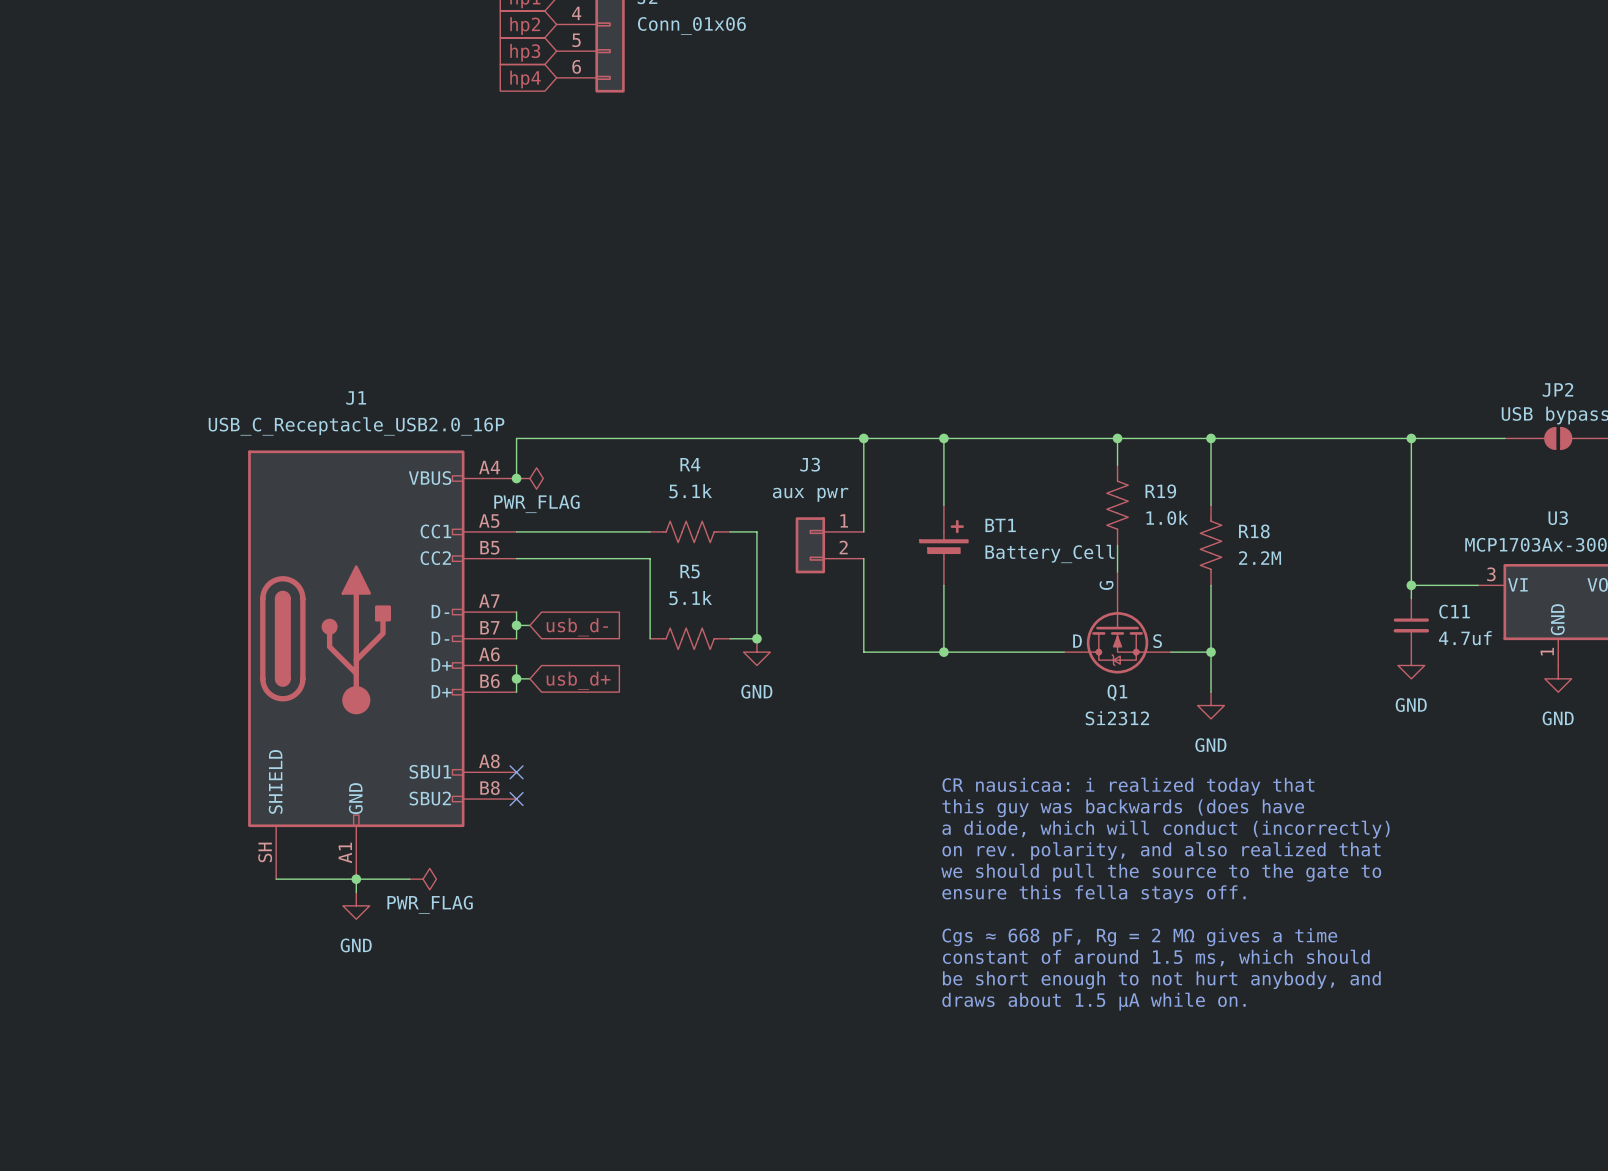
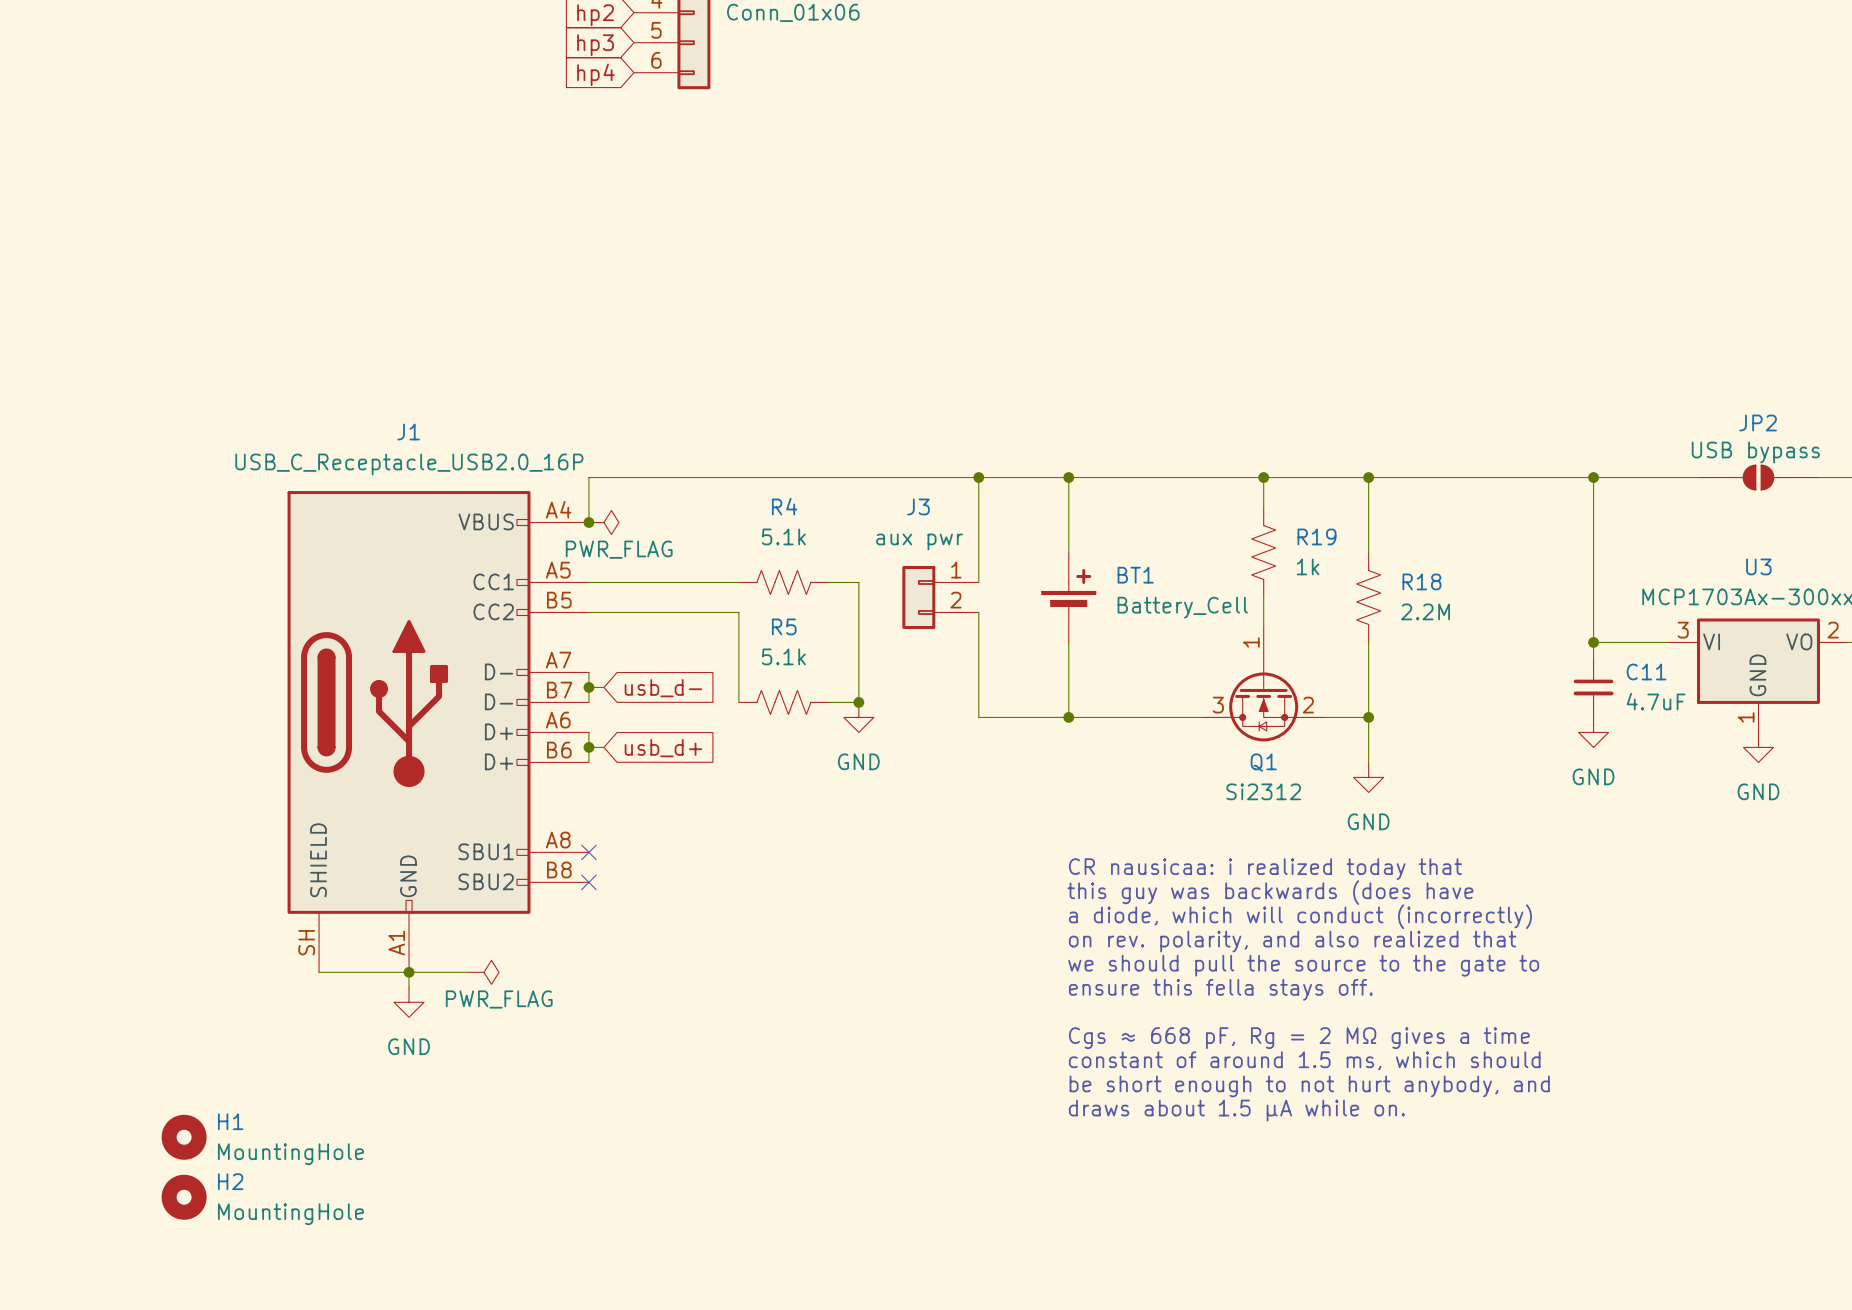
R19 value: 1.0k (1167, 517) -> 1k (1308, 566)
Q1 symbol: [1064, 572, 1171, 674] -> [1203, 627, 1324, 742]
C11 value: 4.7uf (1465, 638) -> 4.7uF (1656, 701)
H1: none -> MountingHole (184, 1137)
H2: none -> MountingHole (184, 1197)

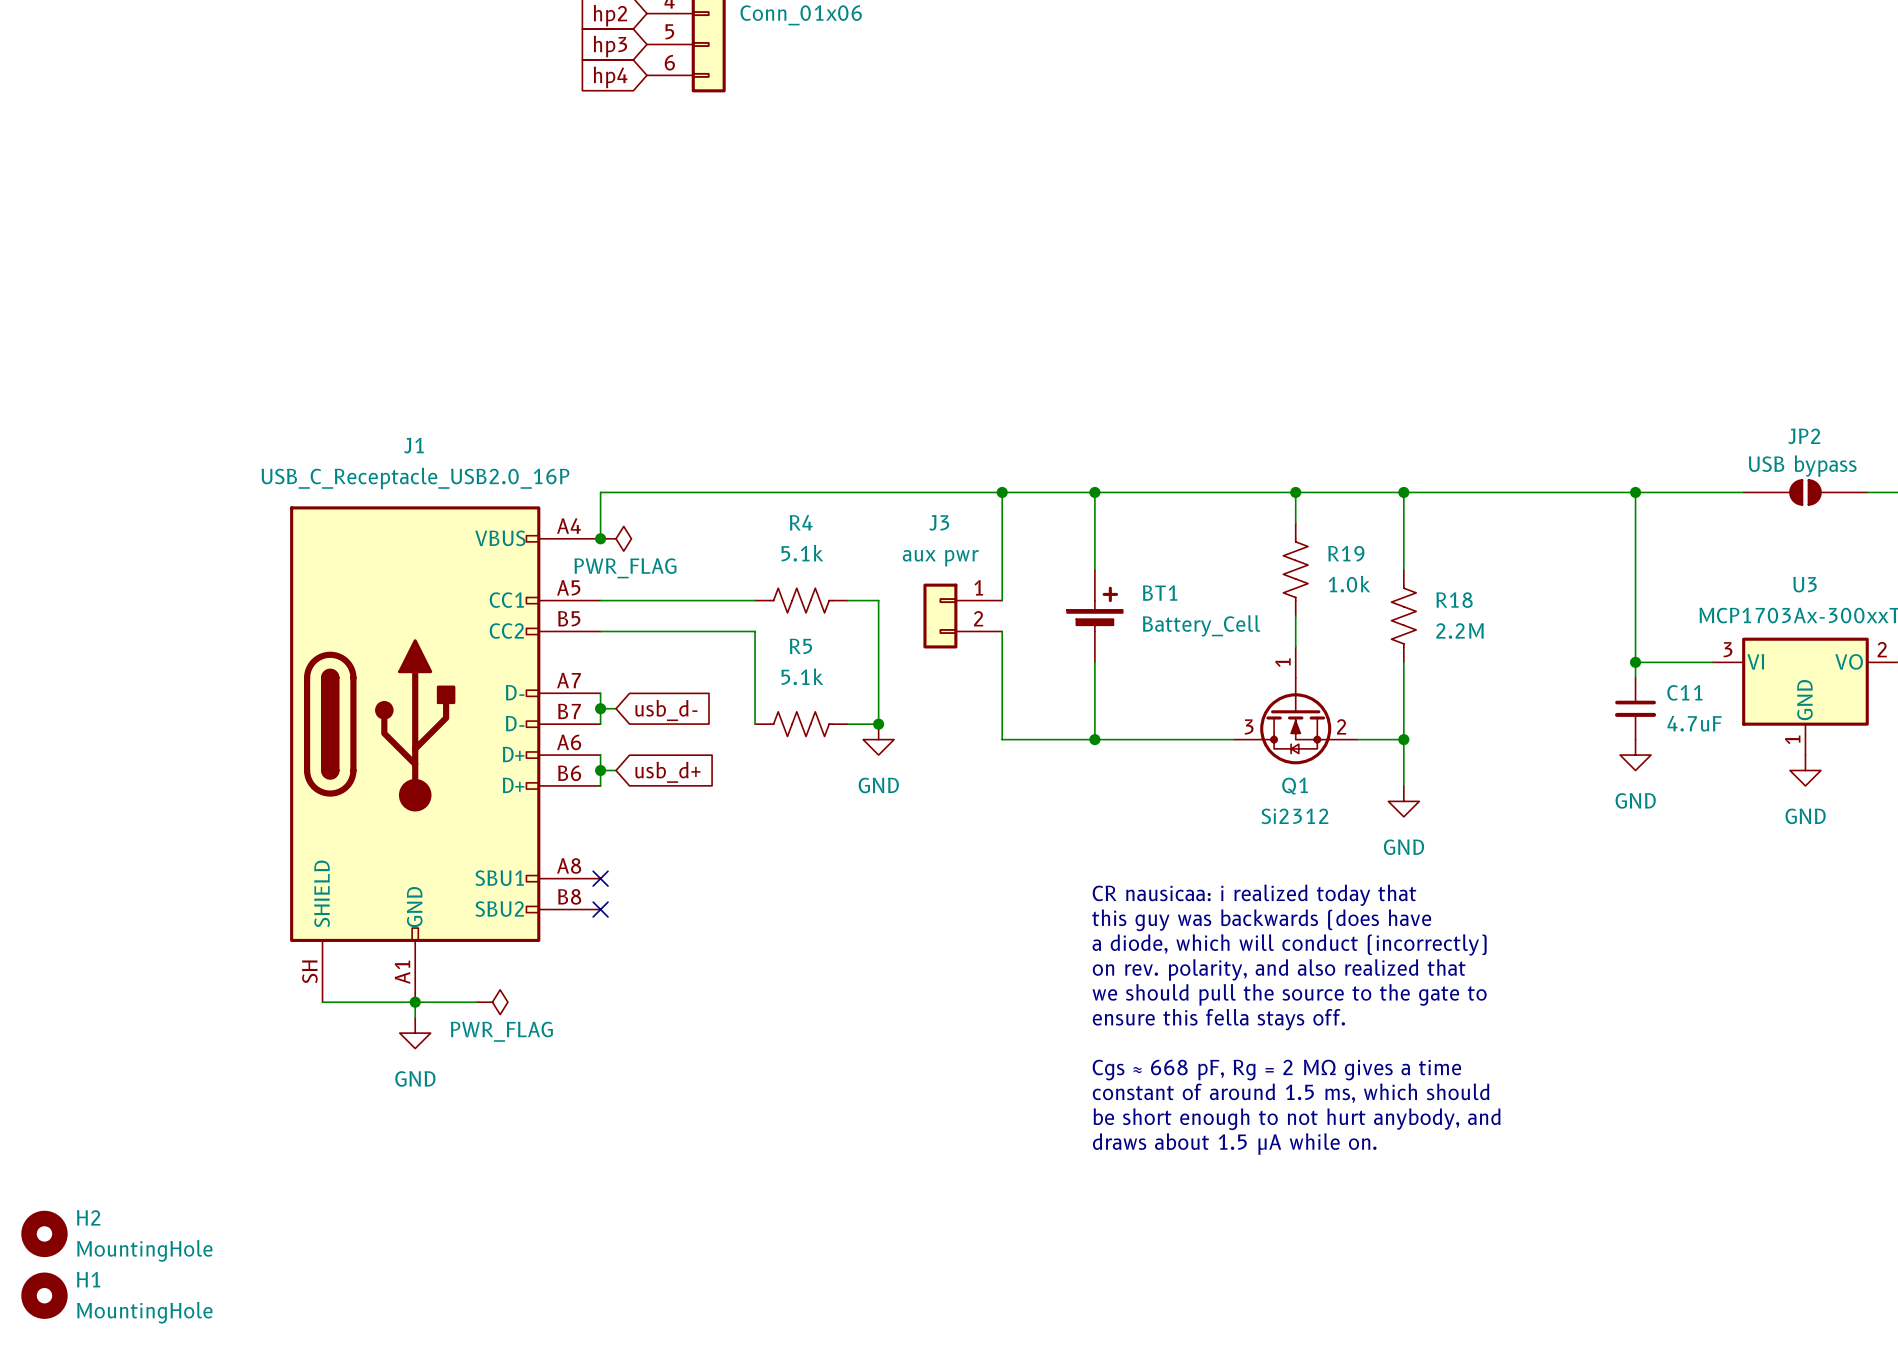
R19 value: 1k (1308, 566) -> 1.0k (1349, 584)
H1 position: (184, 1137) -> (44, 1295)
H2 position: (184, 1197) -> (44, 1233)

